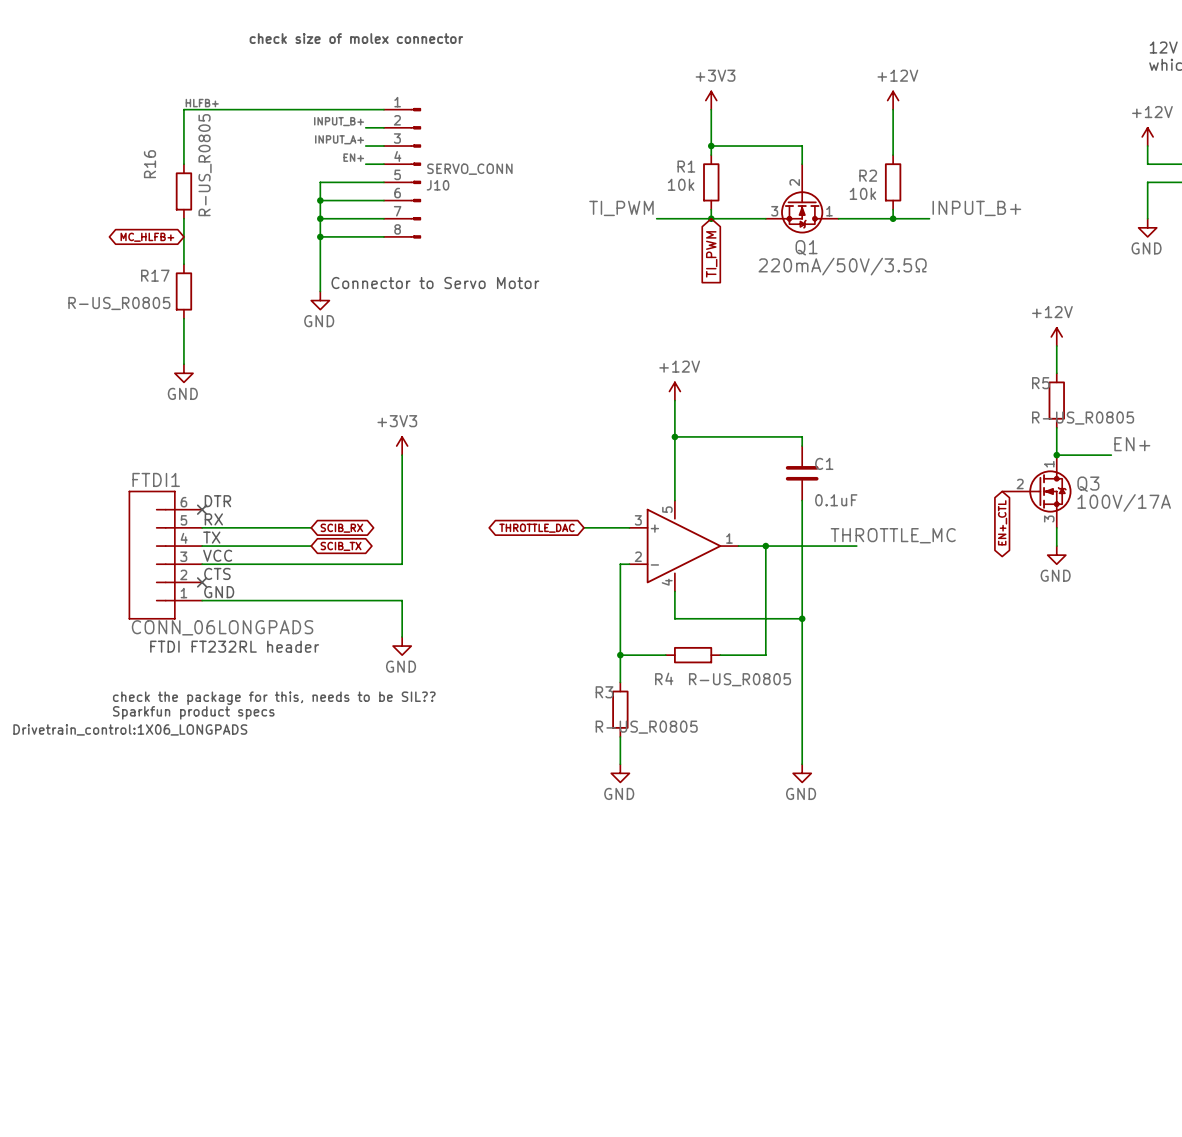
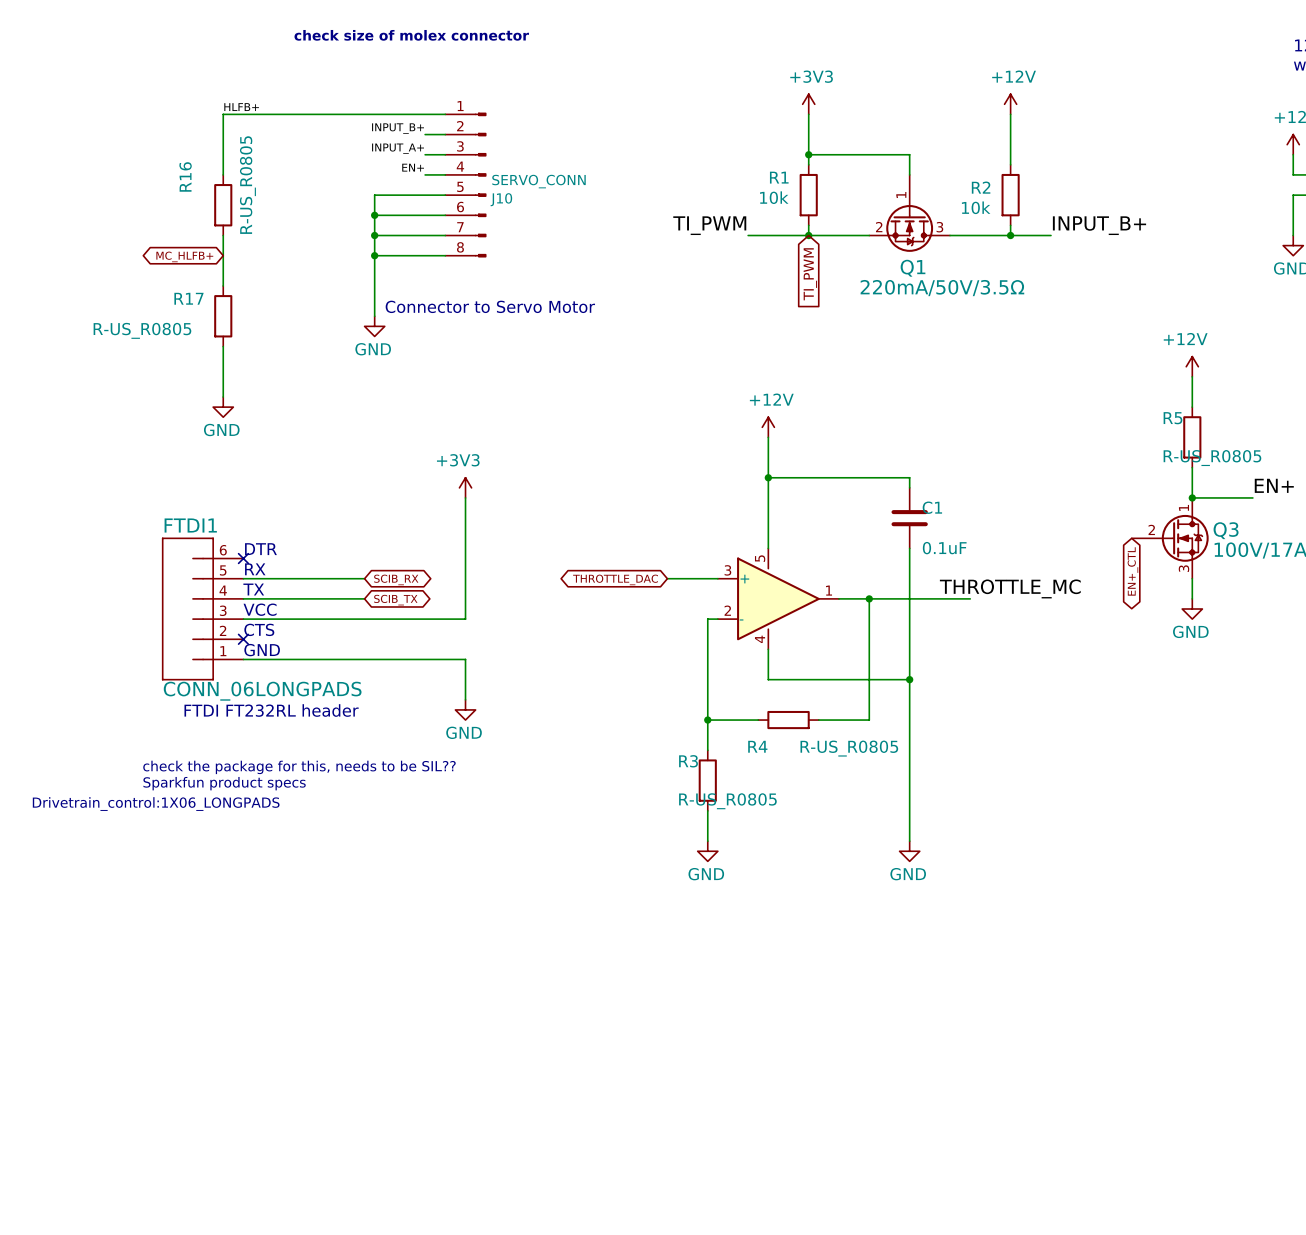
Q1 pin number: 2 (794, 182) -> 1 (901, 195)
Q1 pin number: 3 (774, 211) -> 2 (879, 227)
Q1 pin number: 1 (829, 211) -> 3 (939, 227)

